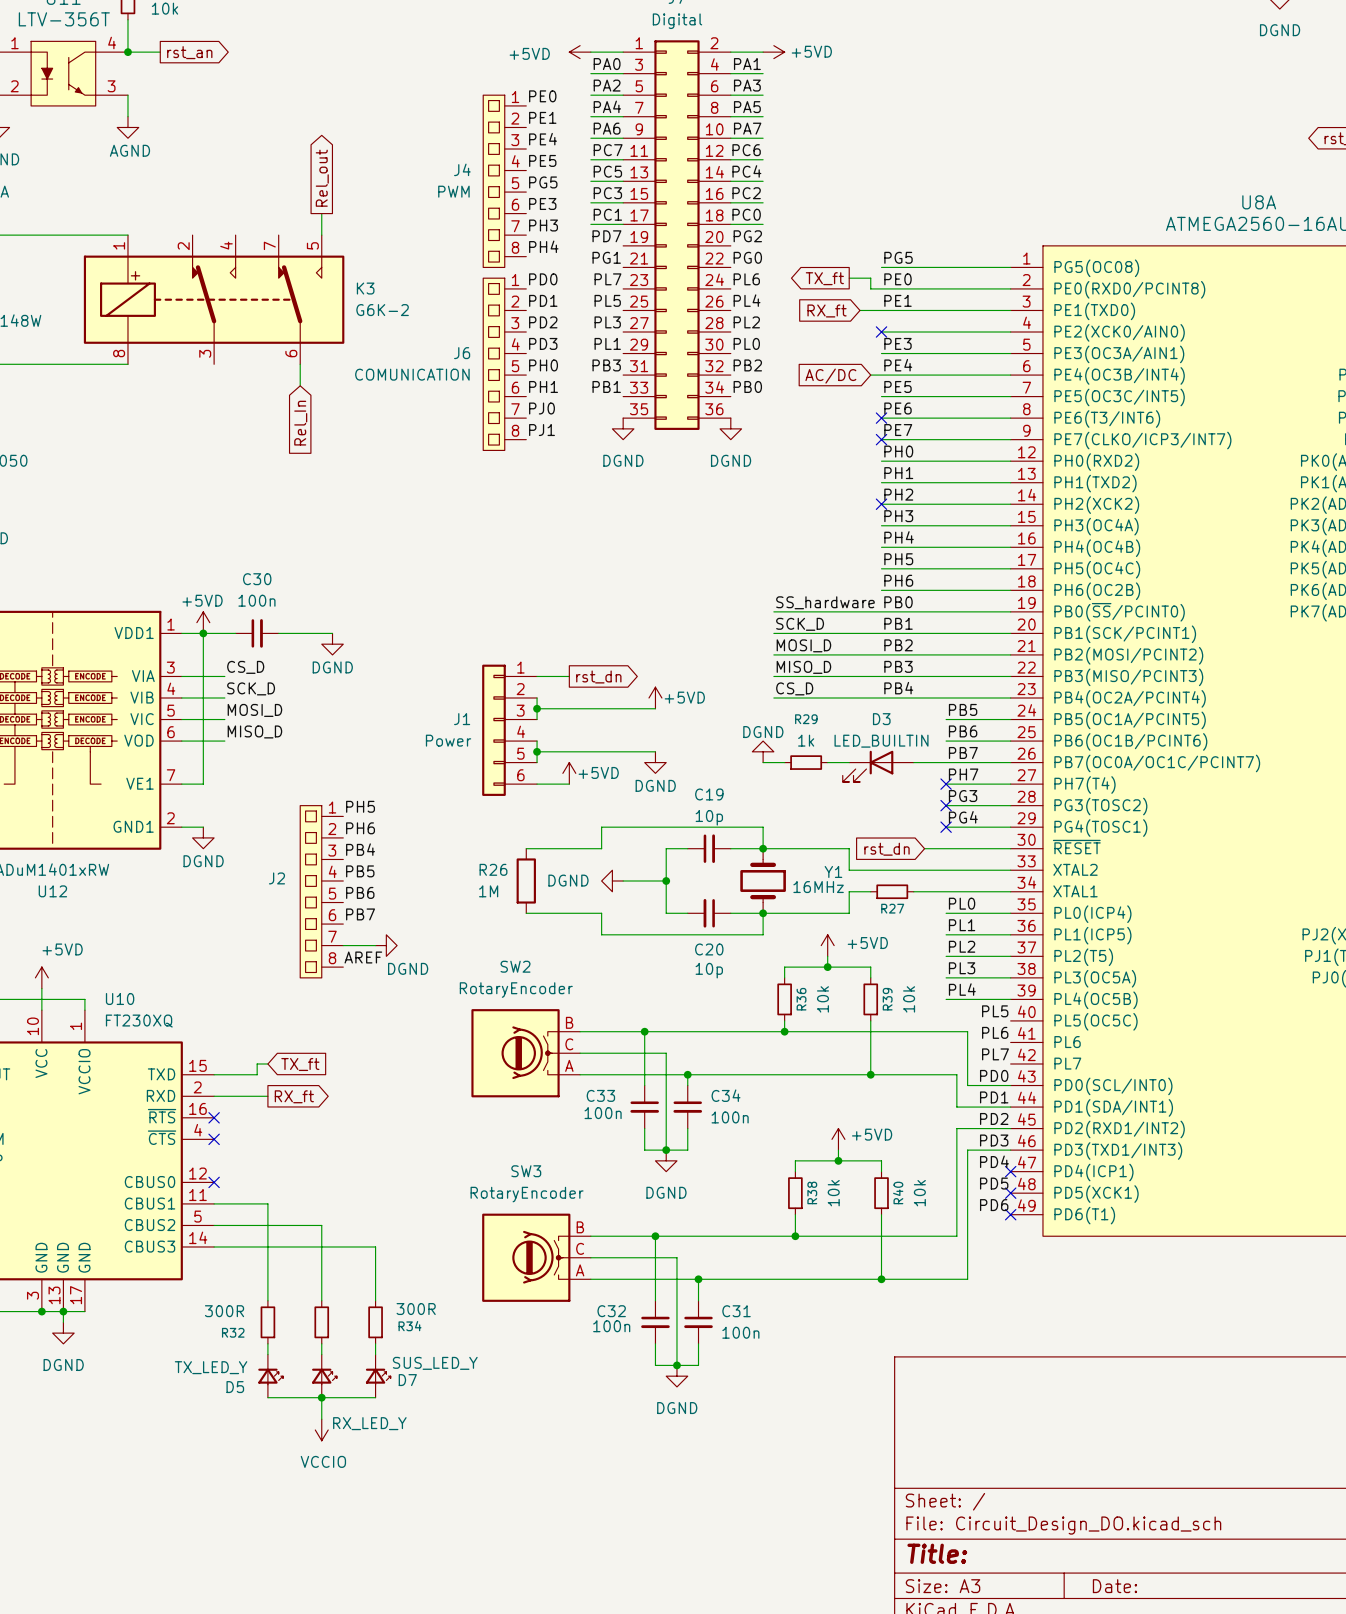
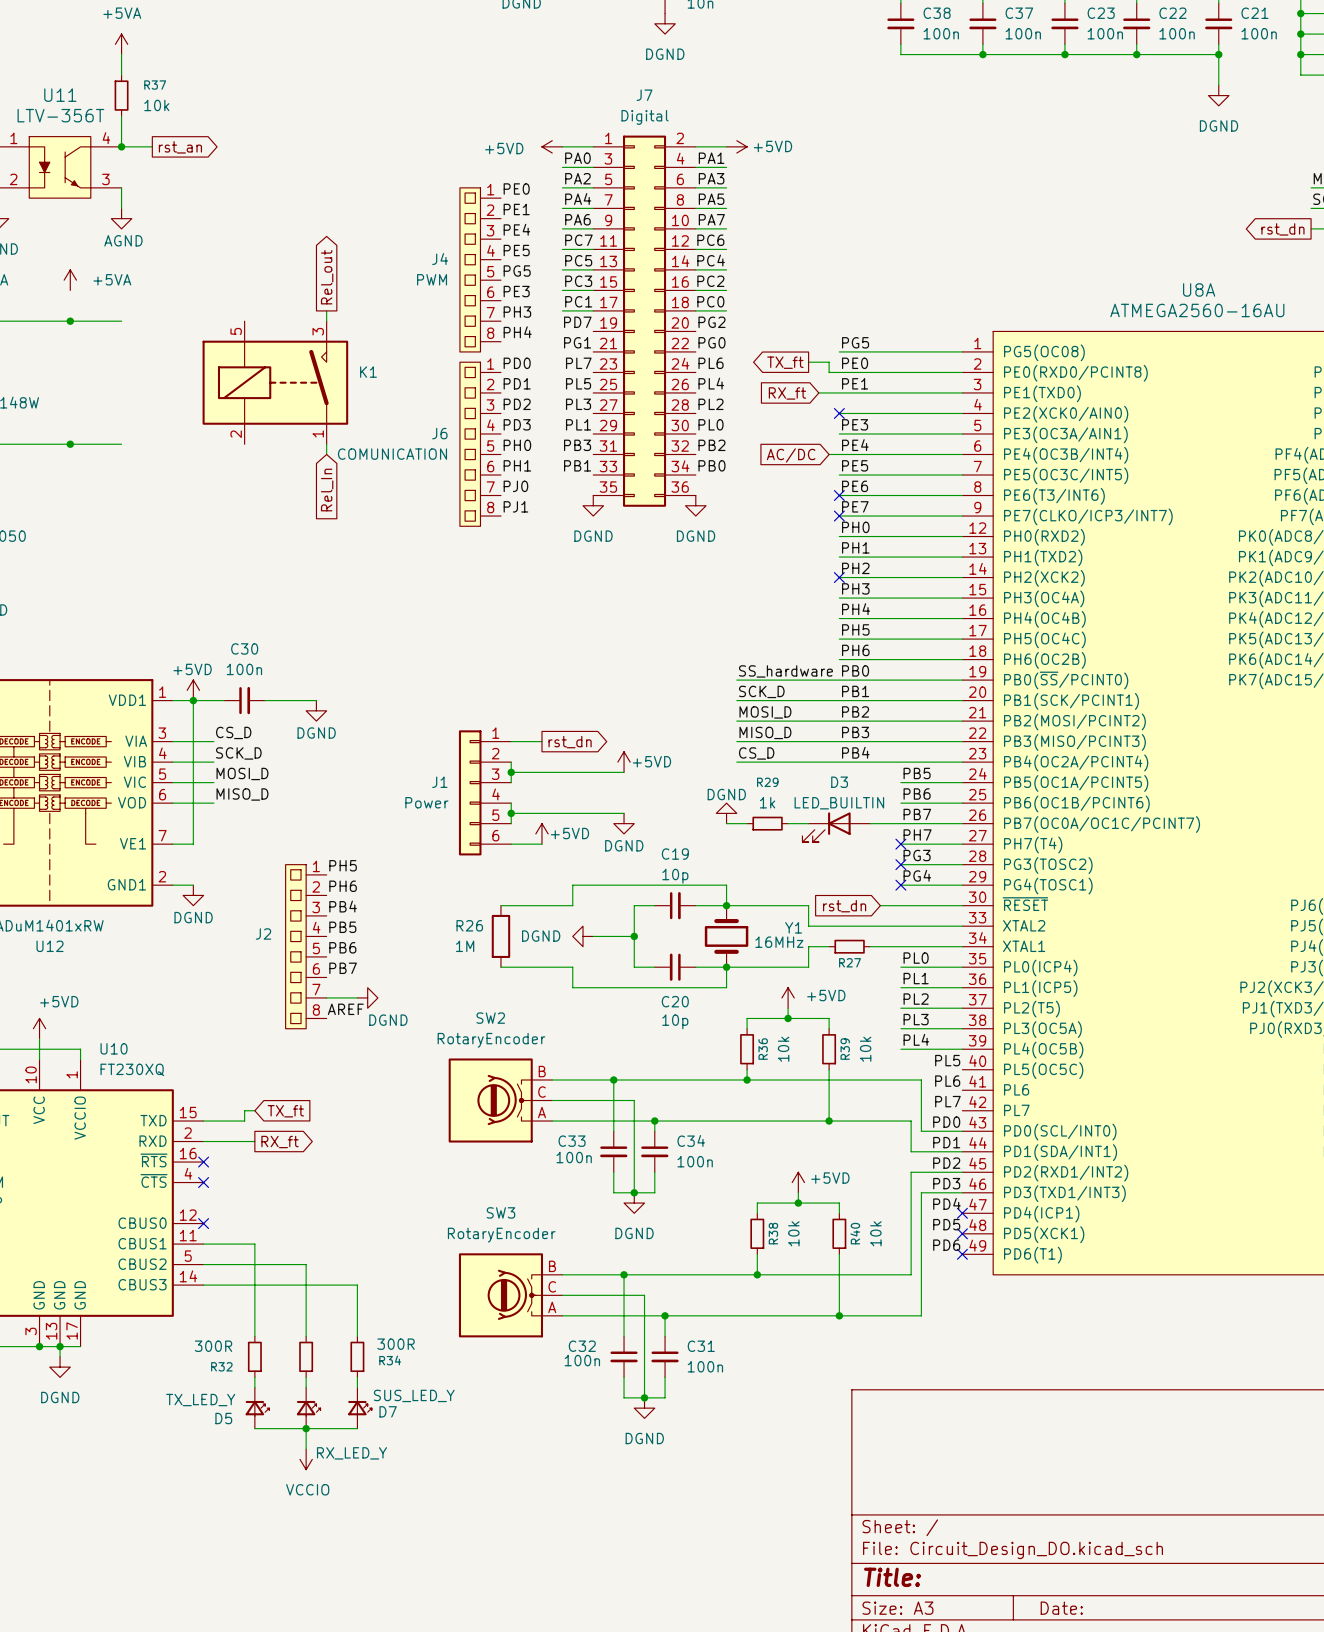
global label position: Rel_out (322, 178) -> Rel_out (327, 277)
power symbol: none -> +5VA (70, 280)
wire: (321, 213) (321, 235) -> none
wire: none -> (326, 310) (326, 321)
junction: none -> (70, 321)
K3: G6K-2 (214, 299) -> none
K1: none -> (275, 382)
junction: none -> (70, 444)
wire: (300, 364) (300, 385) -> none
wire: none -> (326, 444) (326, 454)
global label position: Rel_In (300, 423) -> Rel_In (327, 490)

